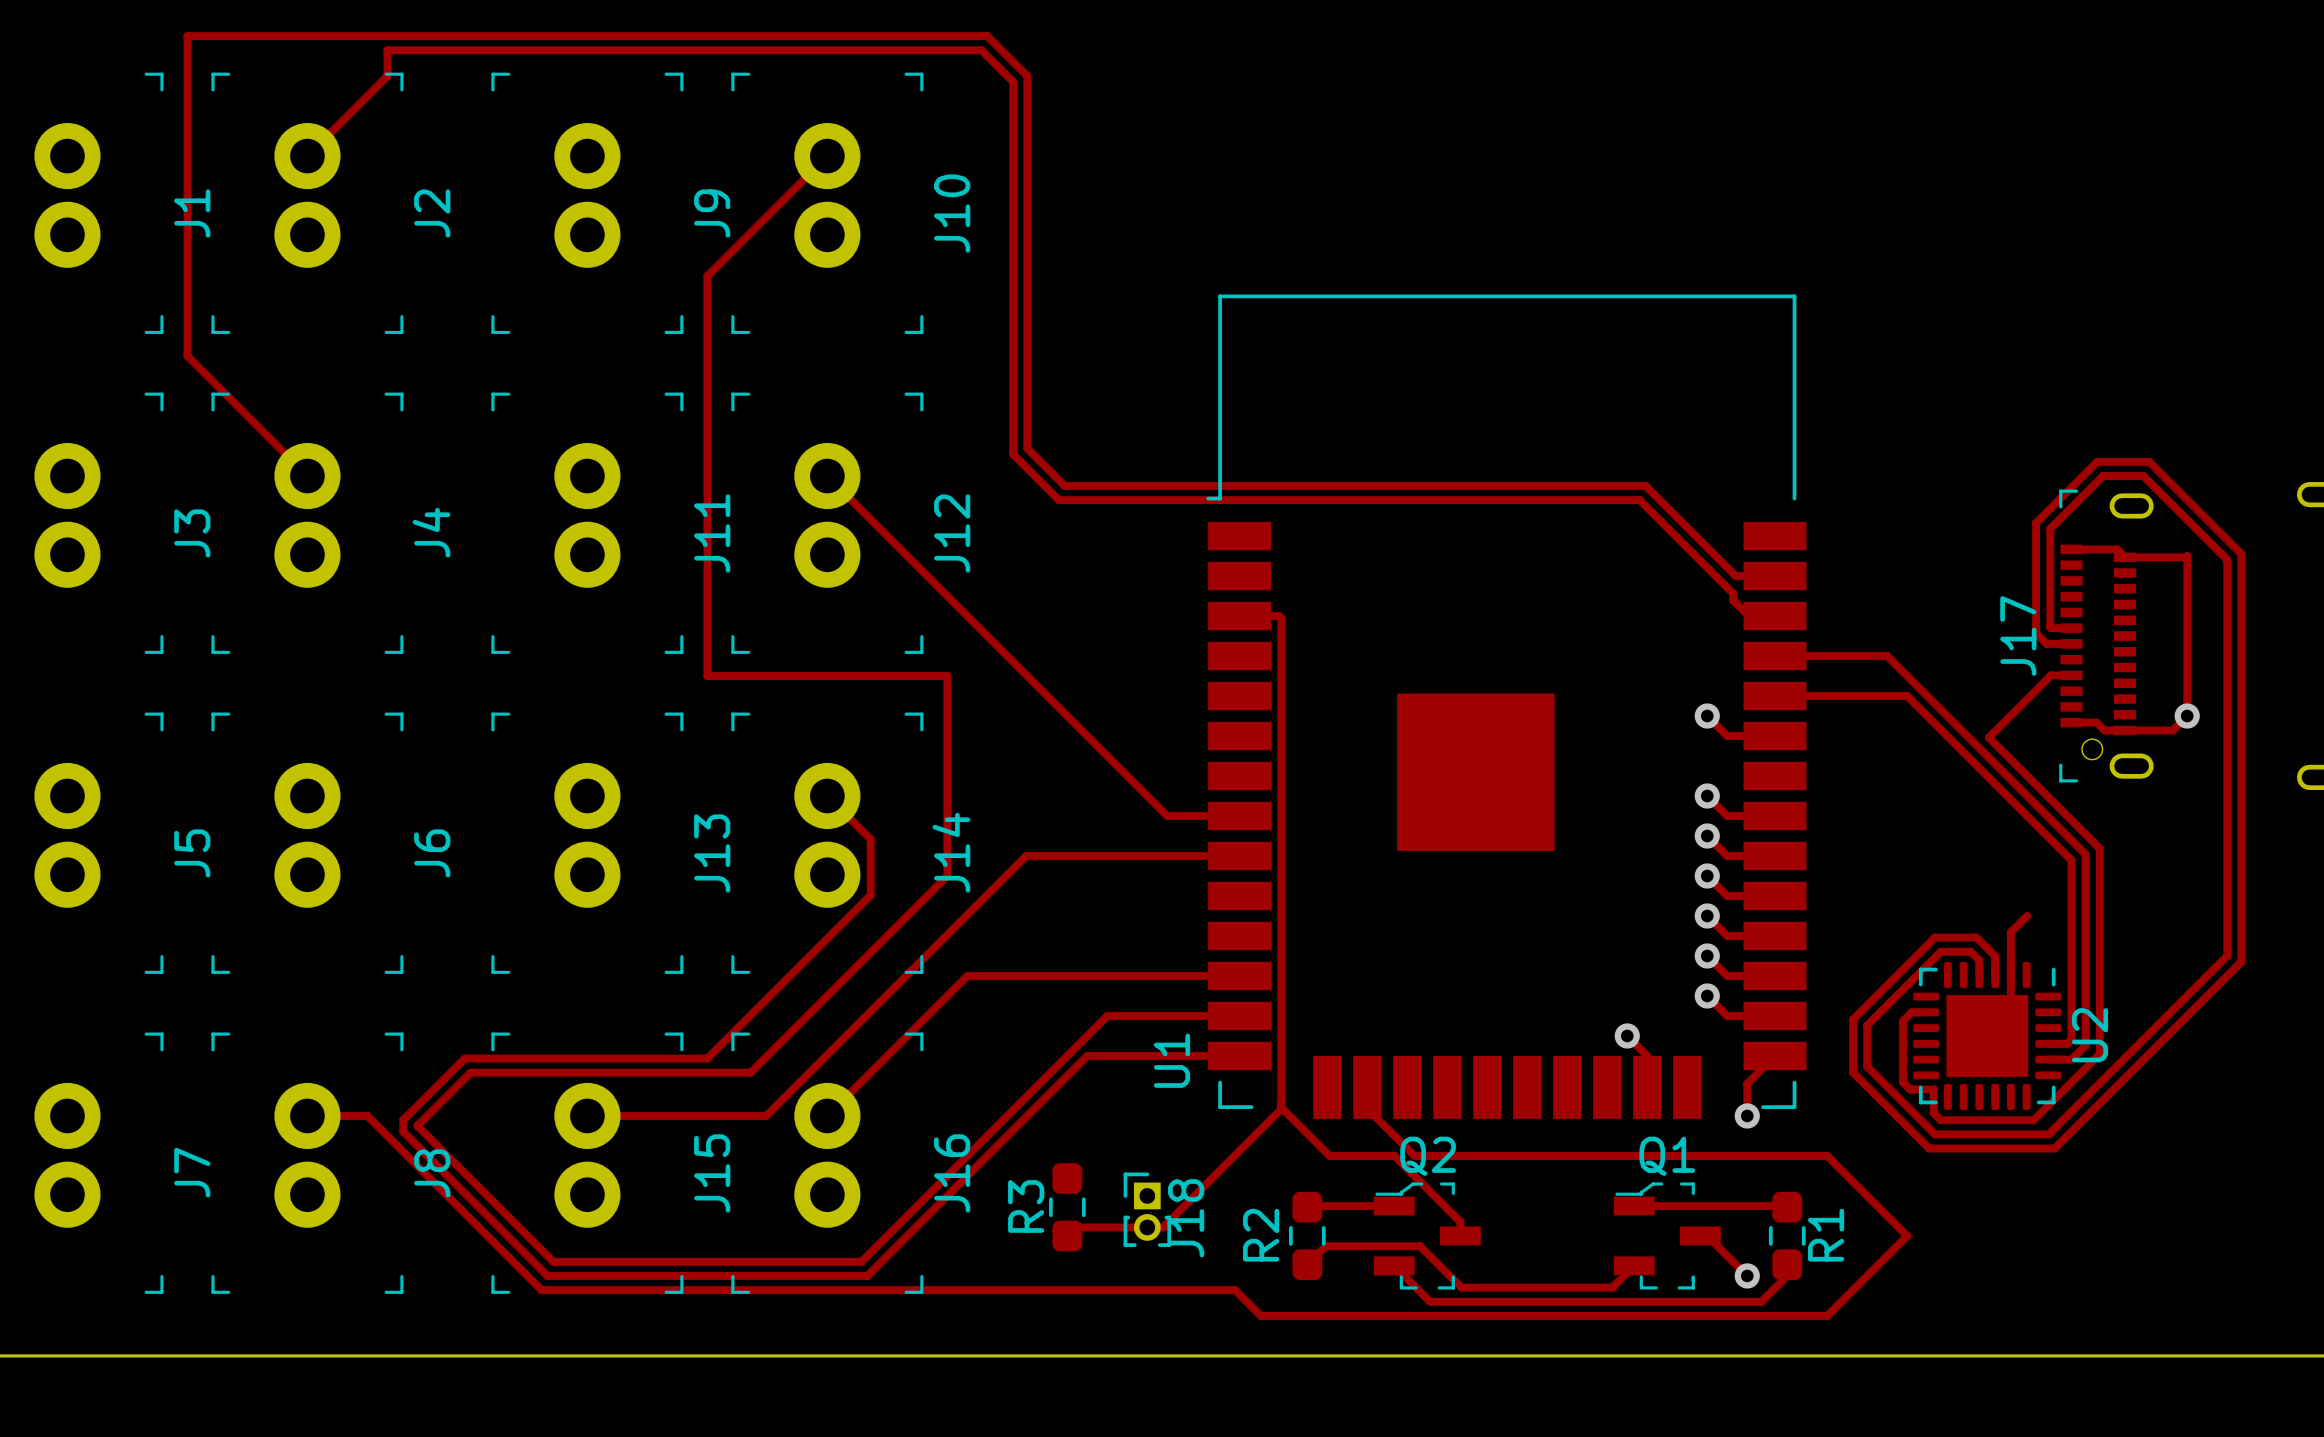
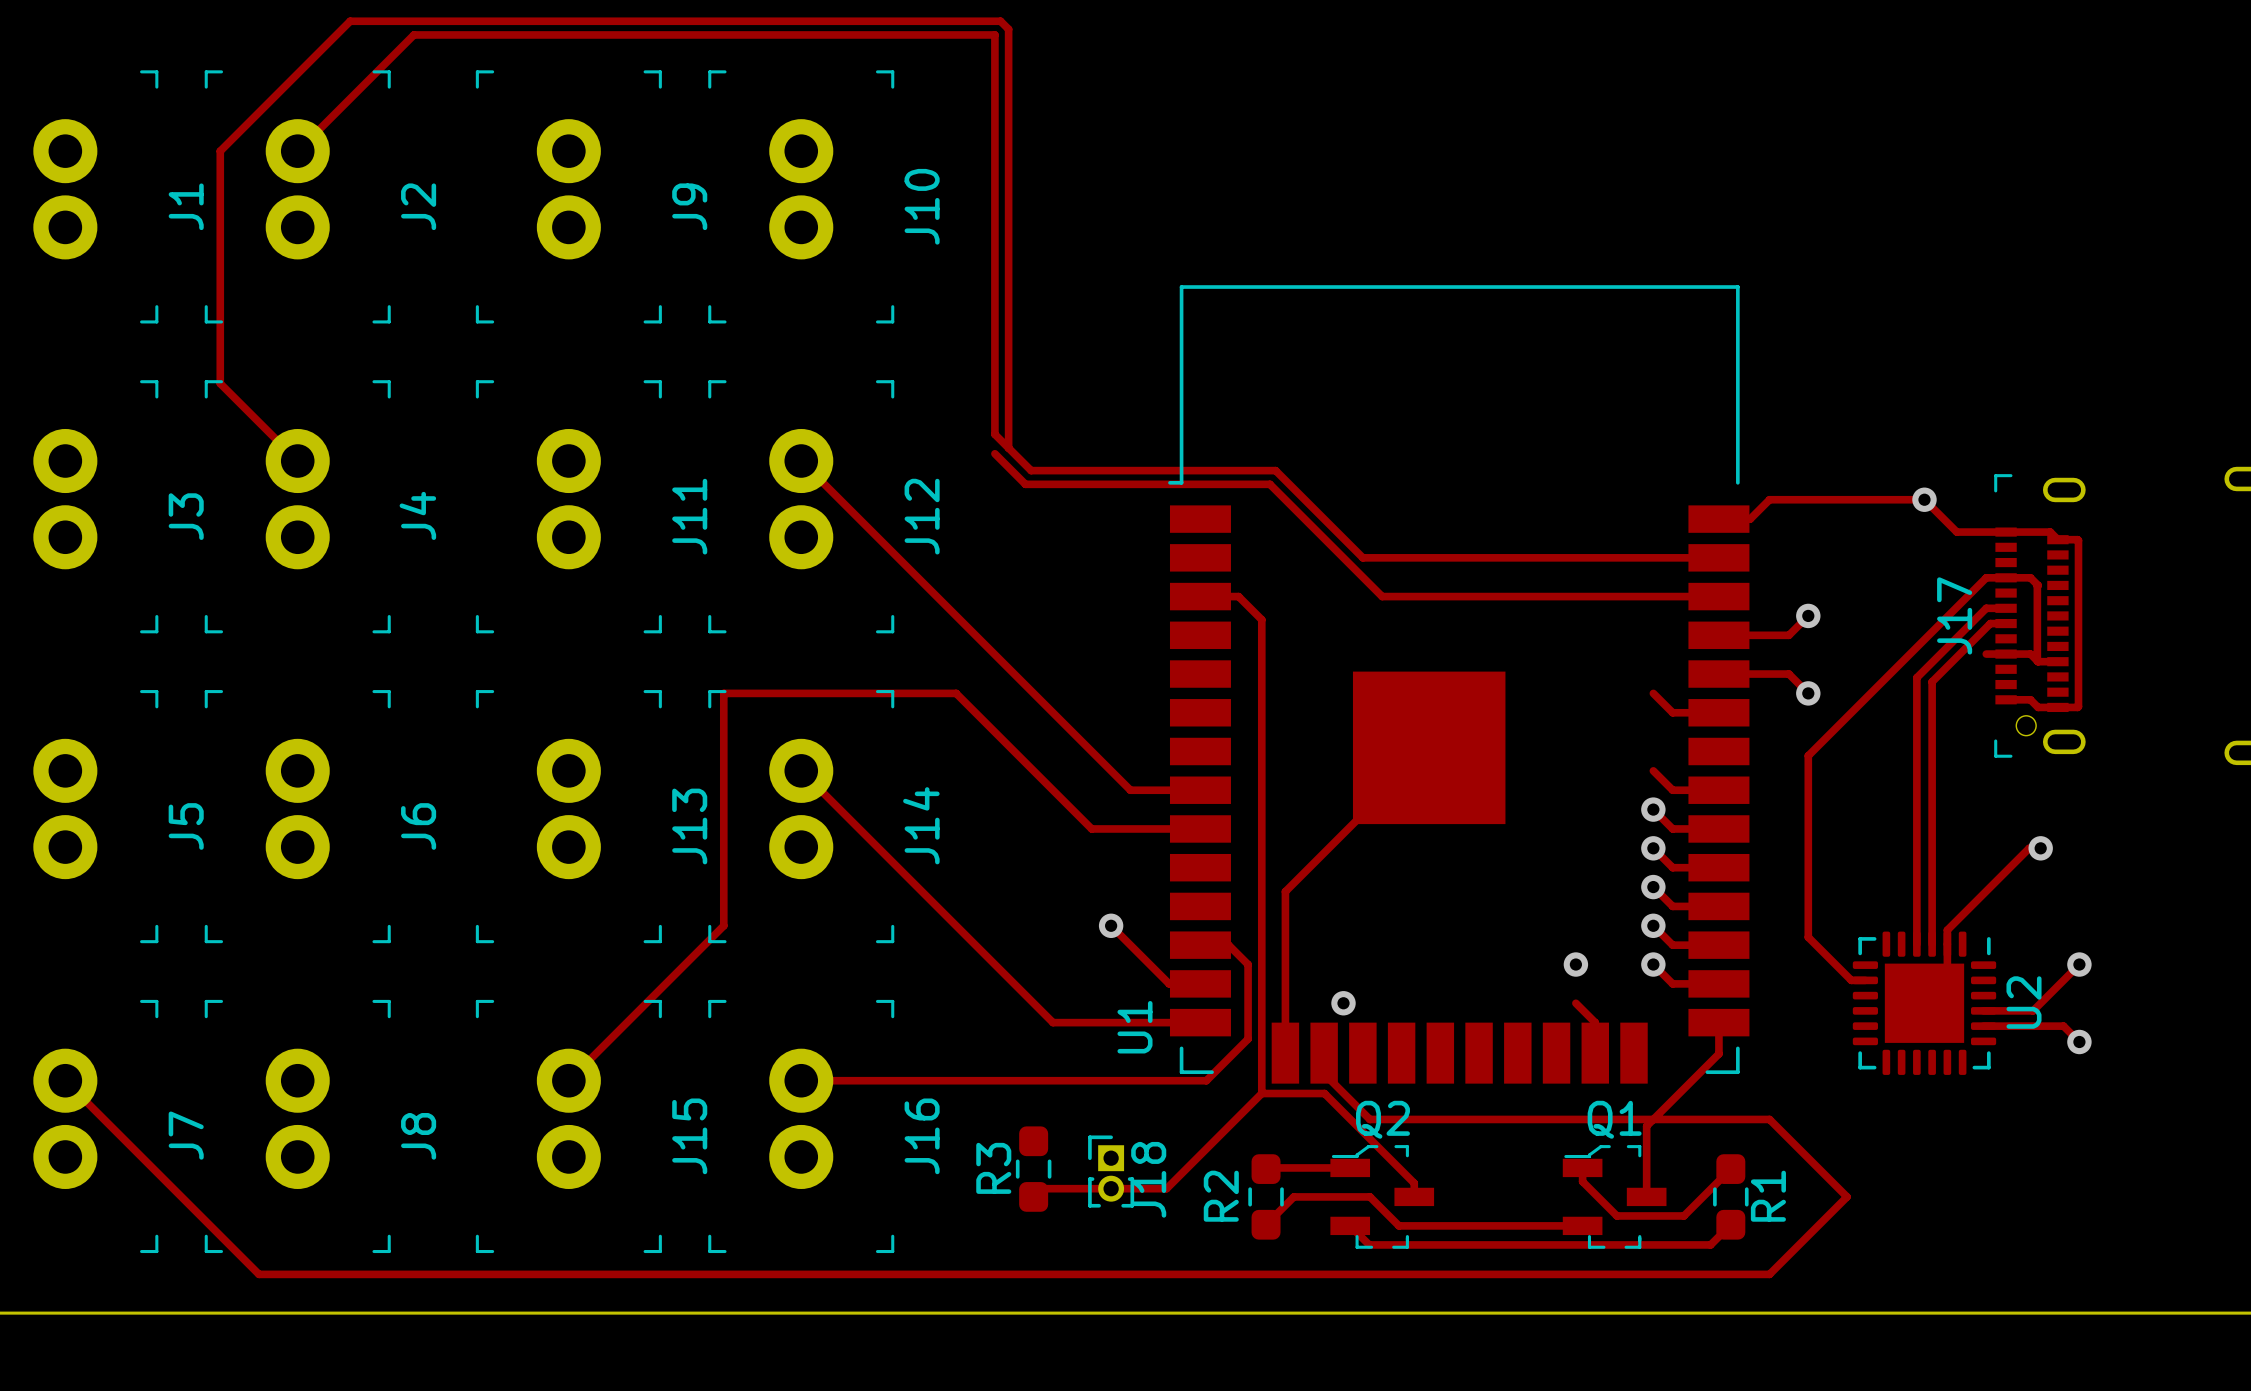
track: (427, 36) (187, 36) (187, 356) (227, 396) -> (413, 34) (375, 73)
track: (987, 36) (1027, 76) -> (956, 34) (994, 34) (994, 73)
track: (387, 76) (387, 50) (981, 50) (1013, 81) (1013, 454) (1027, 468) -> none
track: (827, 156) (707, 276) (707, 676) (947, 676) (947, 875) (750, 1072) (470, 1072) (417, 1125) (553, 1261) (861, 1261) (1107, 1015) (1207, 1015) -> (1111, 925) (1169, 983)
track: none -> (220, 383) (220, 151) (350, 21) (1000, 21) (1008, 29) (1008, 448)
track: (1317, 485) (1645, 485) (1735, 576) -> (1275, 470) (1362, 557) (1680, 557)
track: (1311, 500) (1639, 500) (1733, 593) (1733, 600) (1748, 616) -> (1269, 484) (1382, 596) (1693, 596)
via: none -> (1924, 499)
track: none -> (1718, 519) (1750, 519) (1769, 499) (1924, 499) (1956, 532) (2006, 532)
track: (2145, 557) (2187, 556) (2187, 716) (2172, 730) (2145, 730) -> (2077, 539) (2077, 707)
track: (1281, 618) (1281, 1109) (1163, 1227) -> (1240, 598) (1261, 619) (1261, 1093)
track: (2051, 628) (2050, 528) (2102, 476) (2143, 476) (2227, 559) (2227, 955) (2048, 1134) (1934, 1134) (1867, 1066) (1867, 1025) (1940, 951) (1970, 951) (1979, 960) -> (1986, 608) (1916, 677) (1916, 930)
via: none -> (1808, 615)
track: (2055, 643) (2046, 643) (2036, 633) (2036, 522) (2097, 461) (2149, 461) (2241, 553) (2241, 961) (2054, 1148) (1929, 1148) (1853, 1072) (1853, 1019) (1934, 937) (1976, 937) (1995, 956) -> (1990, 623) (1932, 681) (1932, 926)
track: (1847, 656) (1887, 656) (2085, 854) (2085, 1045) (2071, 1059) -> (1788, 635) (1808, 615)
track: (2051, 675) (1988, 737) (2099, 848) (2099, 1054) (2033, 1120) (1940, 1120) (1933, 1113) (1933, 1089) (1910, 1089) (1903, 1082) (1903, 1021) (1911, 1012) -> (2037, 660) (2038, 585) (2030, 577) (1986, 577) (1808, 755) (1808, 937) (1851, 980)
track: none -> (2006, 654) (2030, 654) (2038, 661) (2057, 661)
track: (1847, 696) (1907, 696) (2071, 860) (2071, 1039) (2067, 1043) -> (1788, 674) (1808, 693)
via: (1707, 716) -> none
via: none -> (1808, 693)
via: (2187, 716) -> none
track: none -> (1429, 747) (1285, 891) (1285, 1053)
via: (1707, 796) -> none
track: (870, 839) (870, 895) (707, 1058) (464, 1058) (403, 1120) (403, 1131) (547, 1275) (867, 1275) (1087, 1055) -> (843, 812) (1053, 1022)
track: (1127, 855) (1026, 855) (766, 1115) (587, 1115) -> (1091, 828) (956, 693) (723, 693) (723, 925) (568, 1080)
via: none -> (2040, 848)
track: (2027, 915) (2010, 932) (2010, 960) -> (2040, 848) (2029, 848) (1947, 930)
via: none -> (1111, 925)
track: (1239, 975) (967, 975) (827, 1115) -> (1200, 945) (1228, 945) (1248, 964) (1248, 1039) (1206, 1080) (801, 1080)
track: none -> (2079, 964) (2033, 1010) (2001, 1010)
via: none -> (2079, 964)
via: none -> (1343, 1003)
via position: (1627, 1035) -> (1575, 964)
track: (1774, 1055) (1747, 1083) (1747, 1115) -> (1718, 1022) (1718, 1053) (1646, 1126) (1646, 1196)
track: none -> (2006, 1026) (2063, 1026) (2079, 1041)
via: none -> (2079, 1041)
track: (1281, 1107) (1329, 1155) (1394, 1155) -> (1261, 1093) (1324, 1093) (1350, 1119)
track: (307, 1115) (367, 1115) (541, 1290) (1235, 1290) (1261, 1315) -> (65, 1080) (259, 1274) (1221, 1274)
via: (1747, 1115) -> none
track: none -> (1261, 1093) (1166, 1188) (1126, 1188)
track: (1634, 1206) (1787, 1207) -> (1582, 1167) (1582, 1181) (1616, 1215) (1683, 1215) (1730, 1169)
track: (1700, 1235) (1707, 1235) (1747, 1275) -> none
track: (1325, 1246) (1420, 1246) (1461, 1287) (1612, 1287) (1634, 1265) -> (1283, 1206) (1293, 1196) (1370, 1196) (1398, 1225) (1582, 1225)
track: (1787, 1264) (1787, 1275) (1761, 1301) (1430, 1301) (1413, 1285) -> (1730, 1224) (1710, 1244) (1369, 1244)
via: (1747, 1275) -> none

